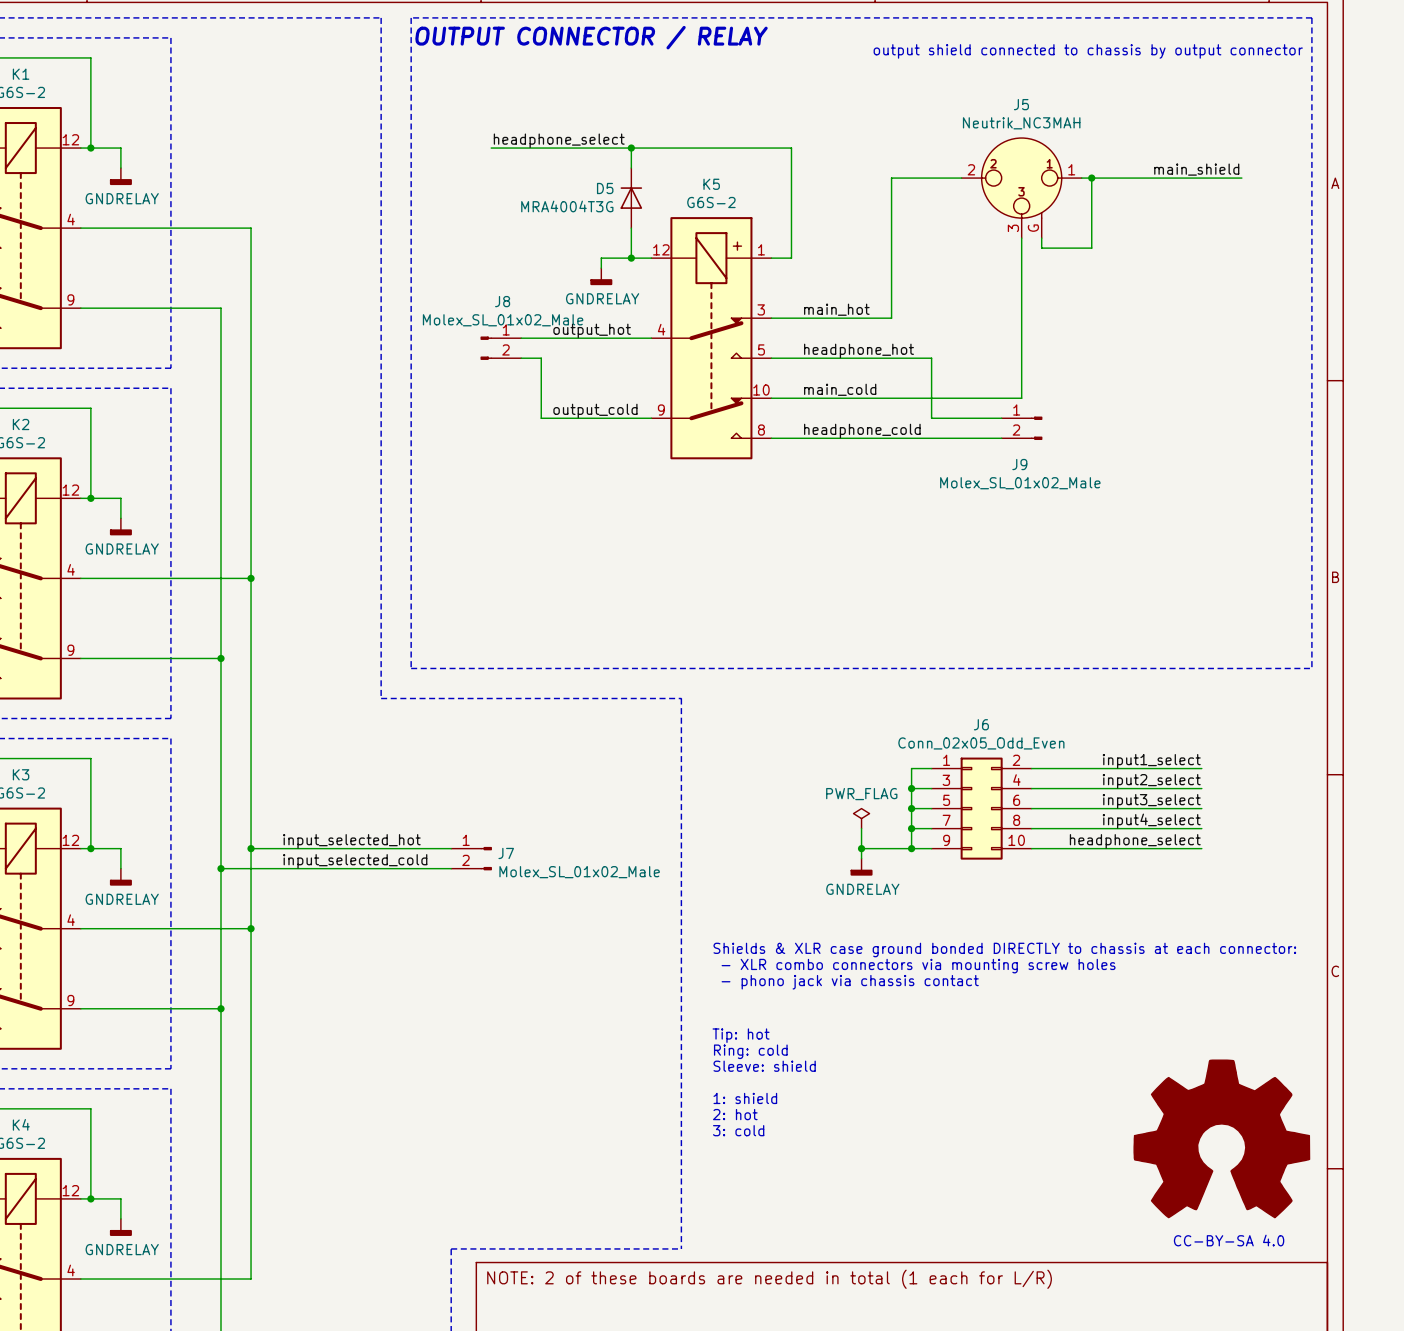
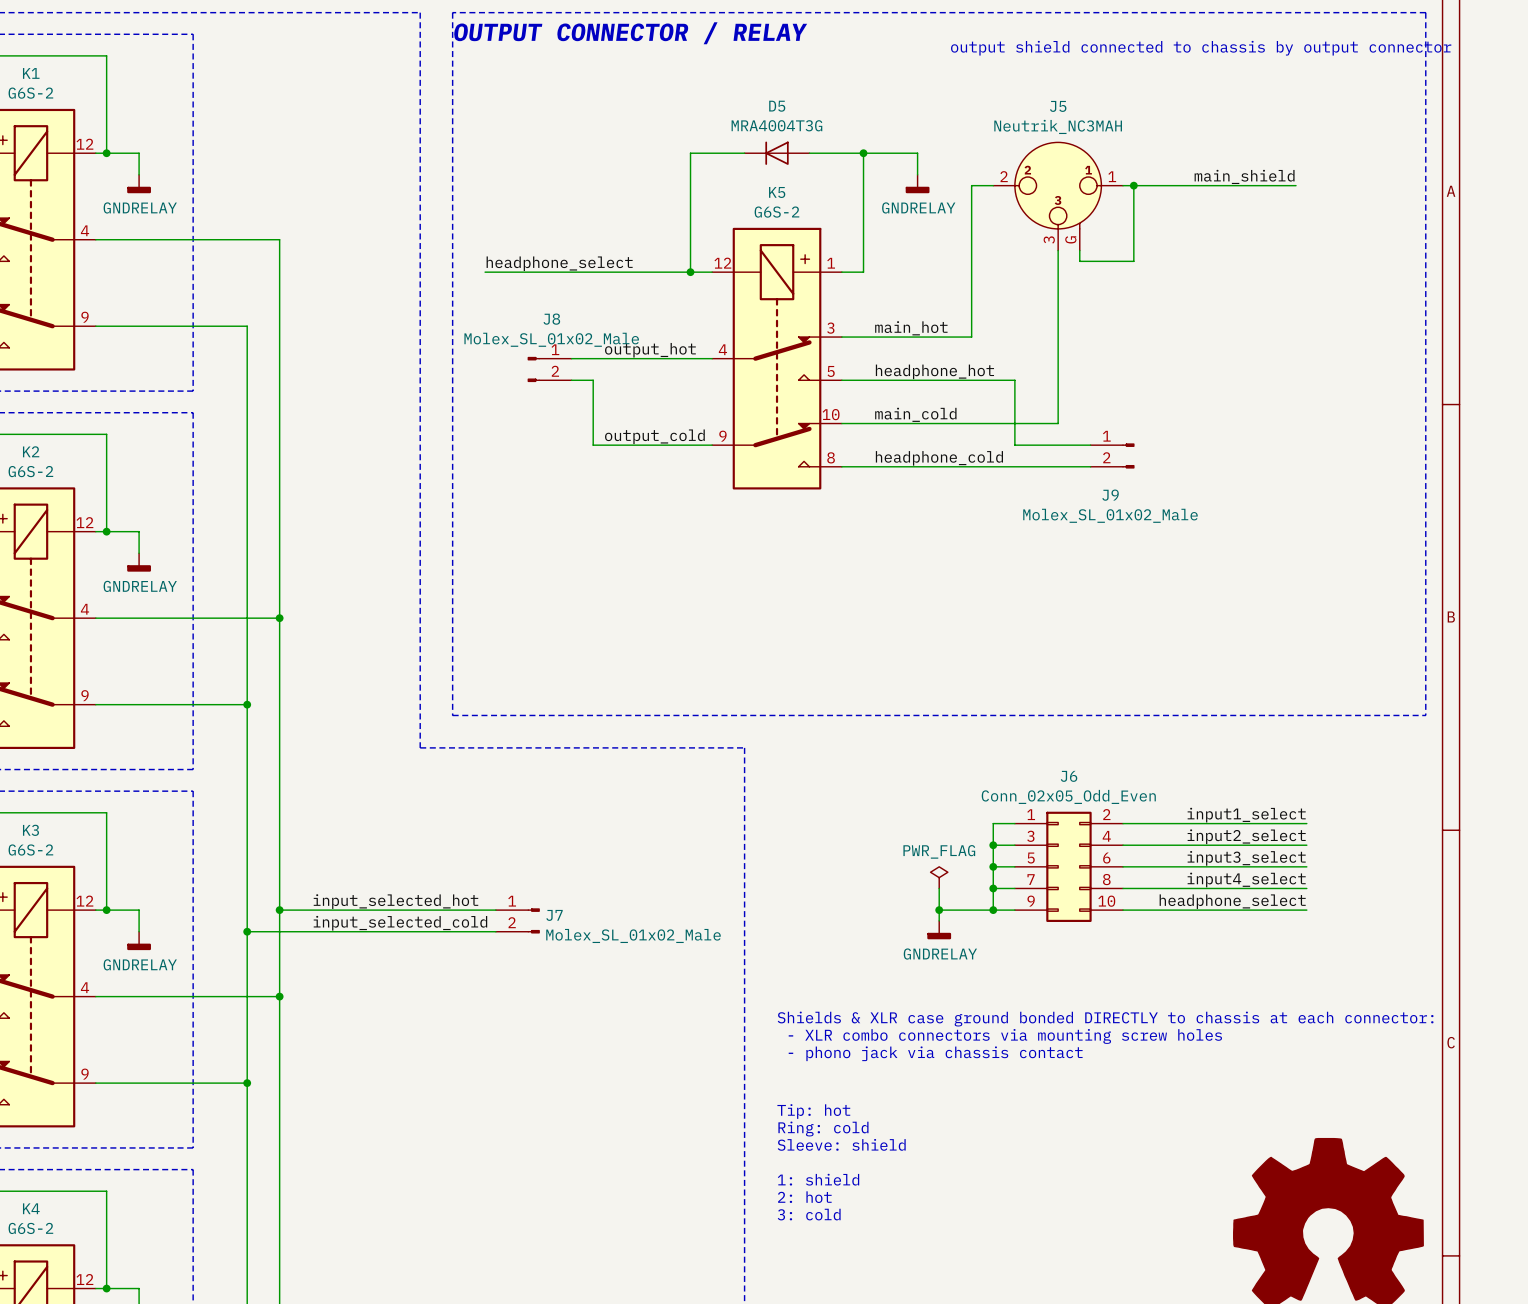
label position: headphone_select (559, 140) -> headphone_select (559, 263)
wire: (491, 148) (631, 148) -> none
junction: (631, 148) -> none
wire: none -> (863, 153) (917, 153) (917, 174)
junction: none -> (863, 153)
label position: main_shield (1196, 169) -> main_shield (1244, 176)
power symbol: none -> GNDRELAY (917, 184)
junction: none -> (1133, 185)
wire: (1091, 178) (1091, 248) (1041, 248) -> (1079, 250) (1079, 261) (1133, 261)
junction: (1091, 178) -> none
wire: (1191, 178) (1241, 178) -> none
D5 name position: D5 (605, 188) -> D5 (777, 106)
J5 position: (1021, 188) -> (1058, 196)
D5 rotation: 0° (631, 198) -> 90° counterclockwise (777, 153)
D5 position: (631, 198) -> (777, 153)
D5 value position: MRA4004T3G (567, 206) -> MRA4004T3G (776, 125)
wire: (1021, 238) (1021, 398) (971, 398) -> (1058, 250) (1058, 423)
wire: (601, 258) (601, 268) -> (658, 272) (485, 272)
power symbol: GNDRELAY (601, 276) -> none

